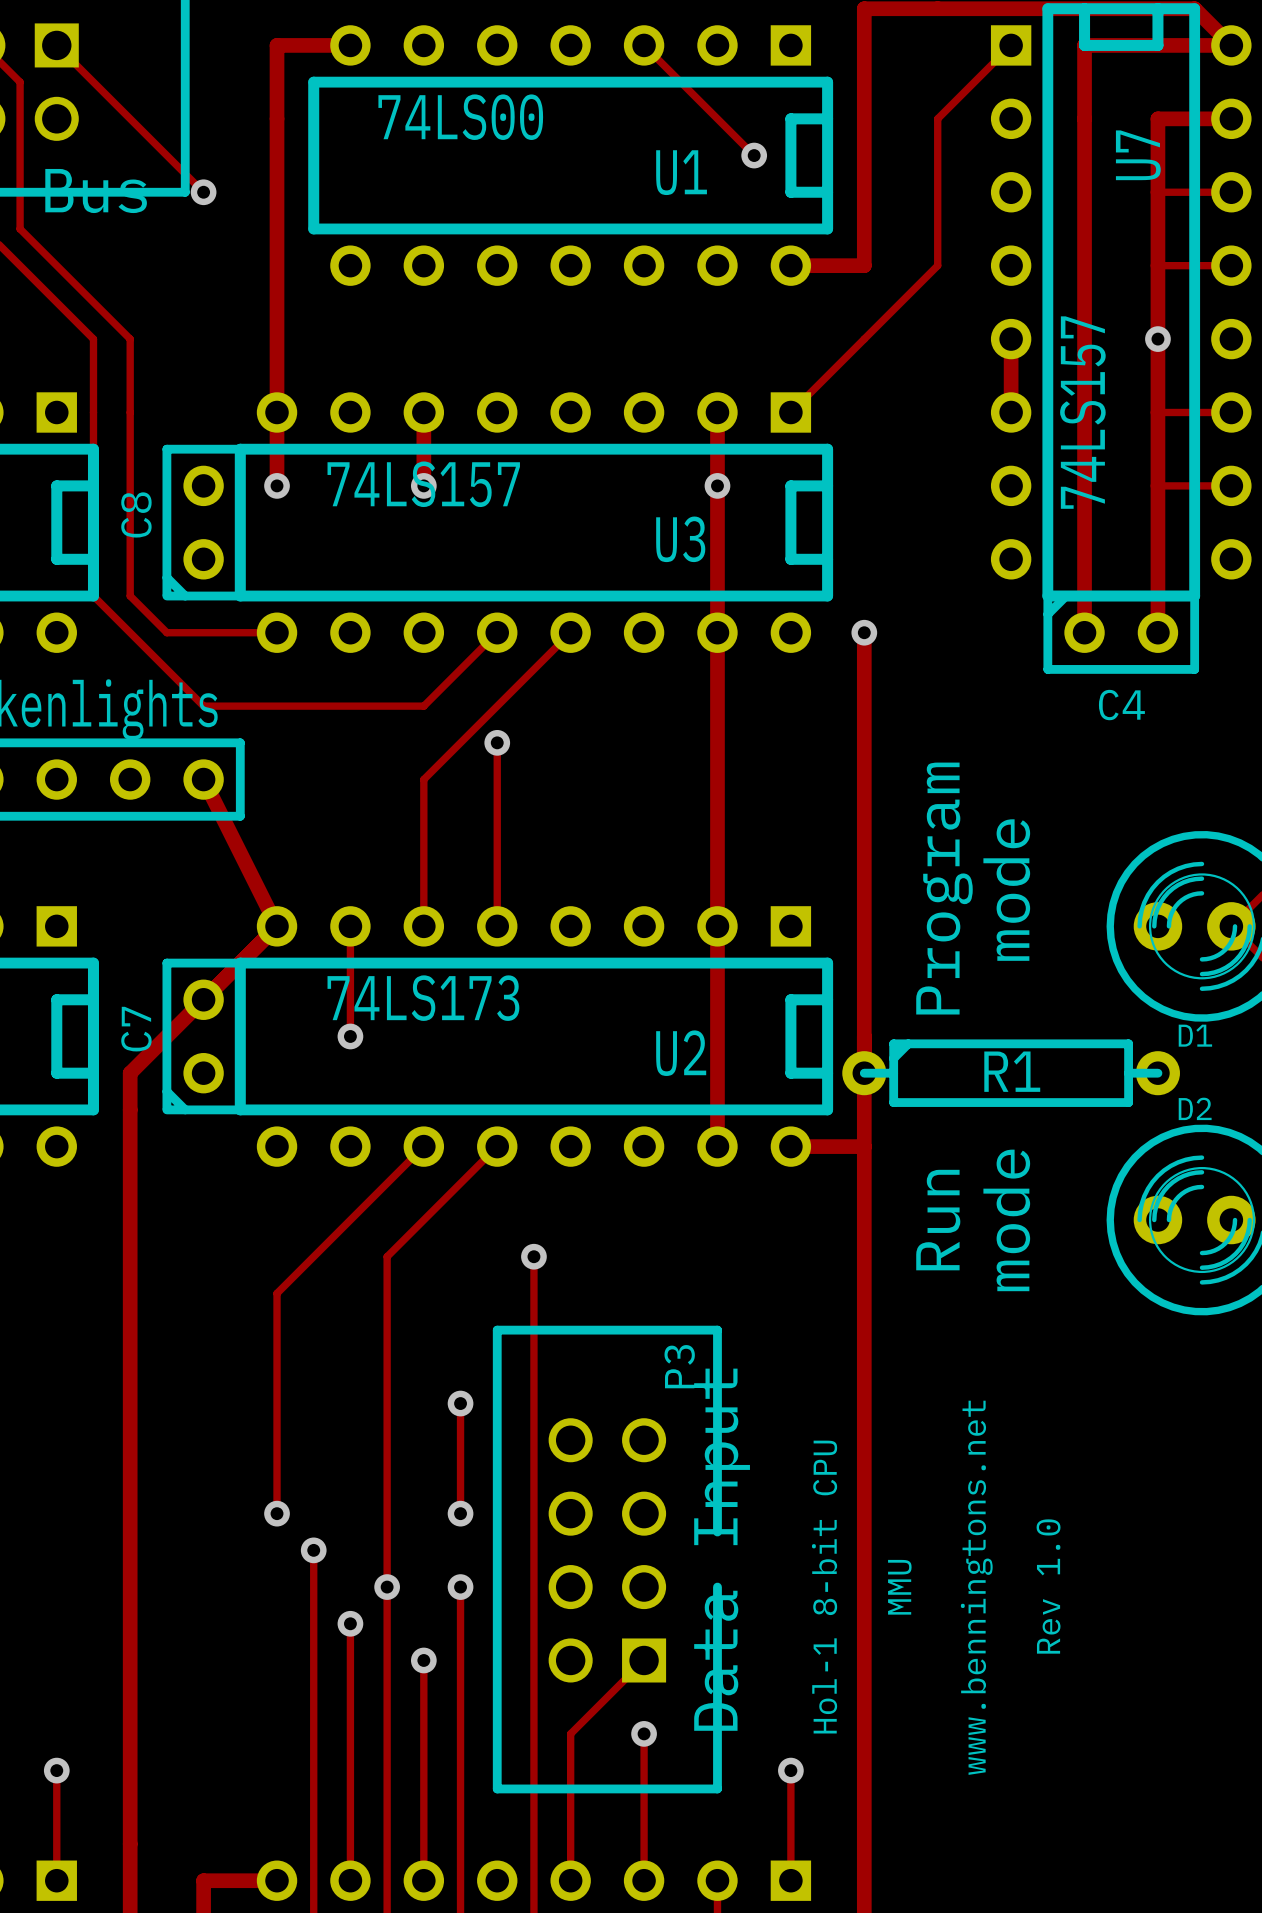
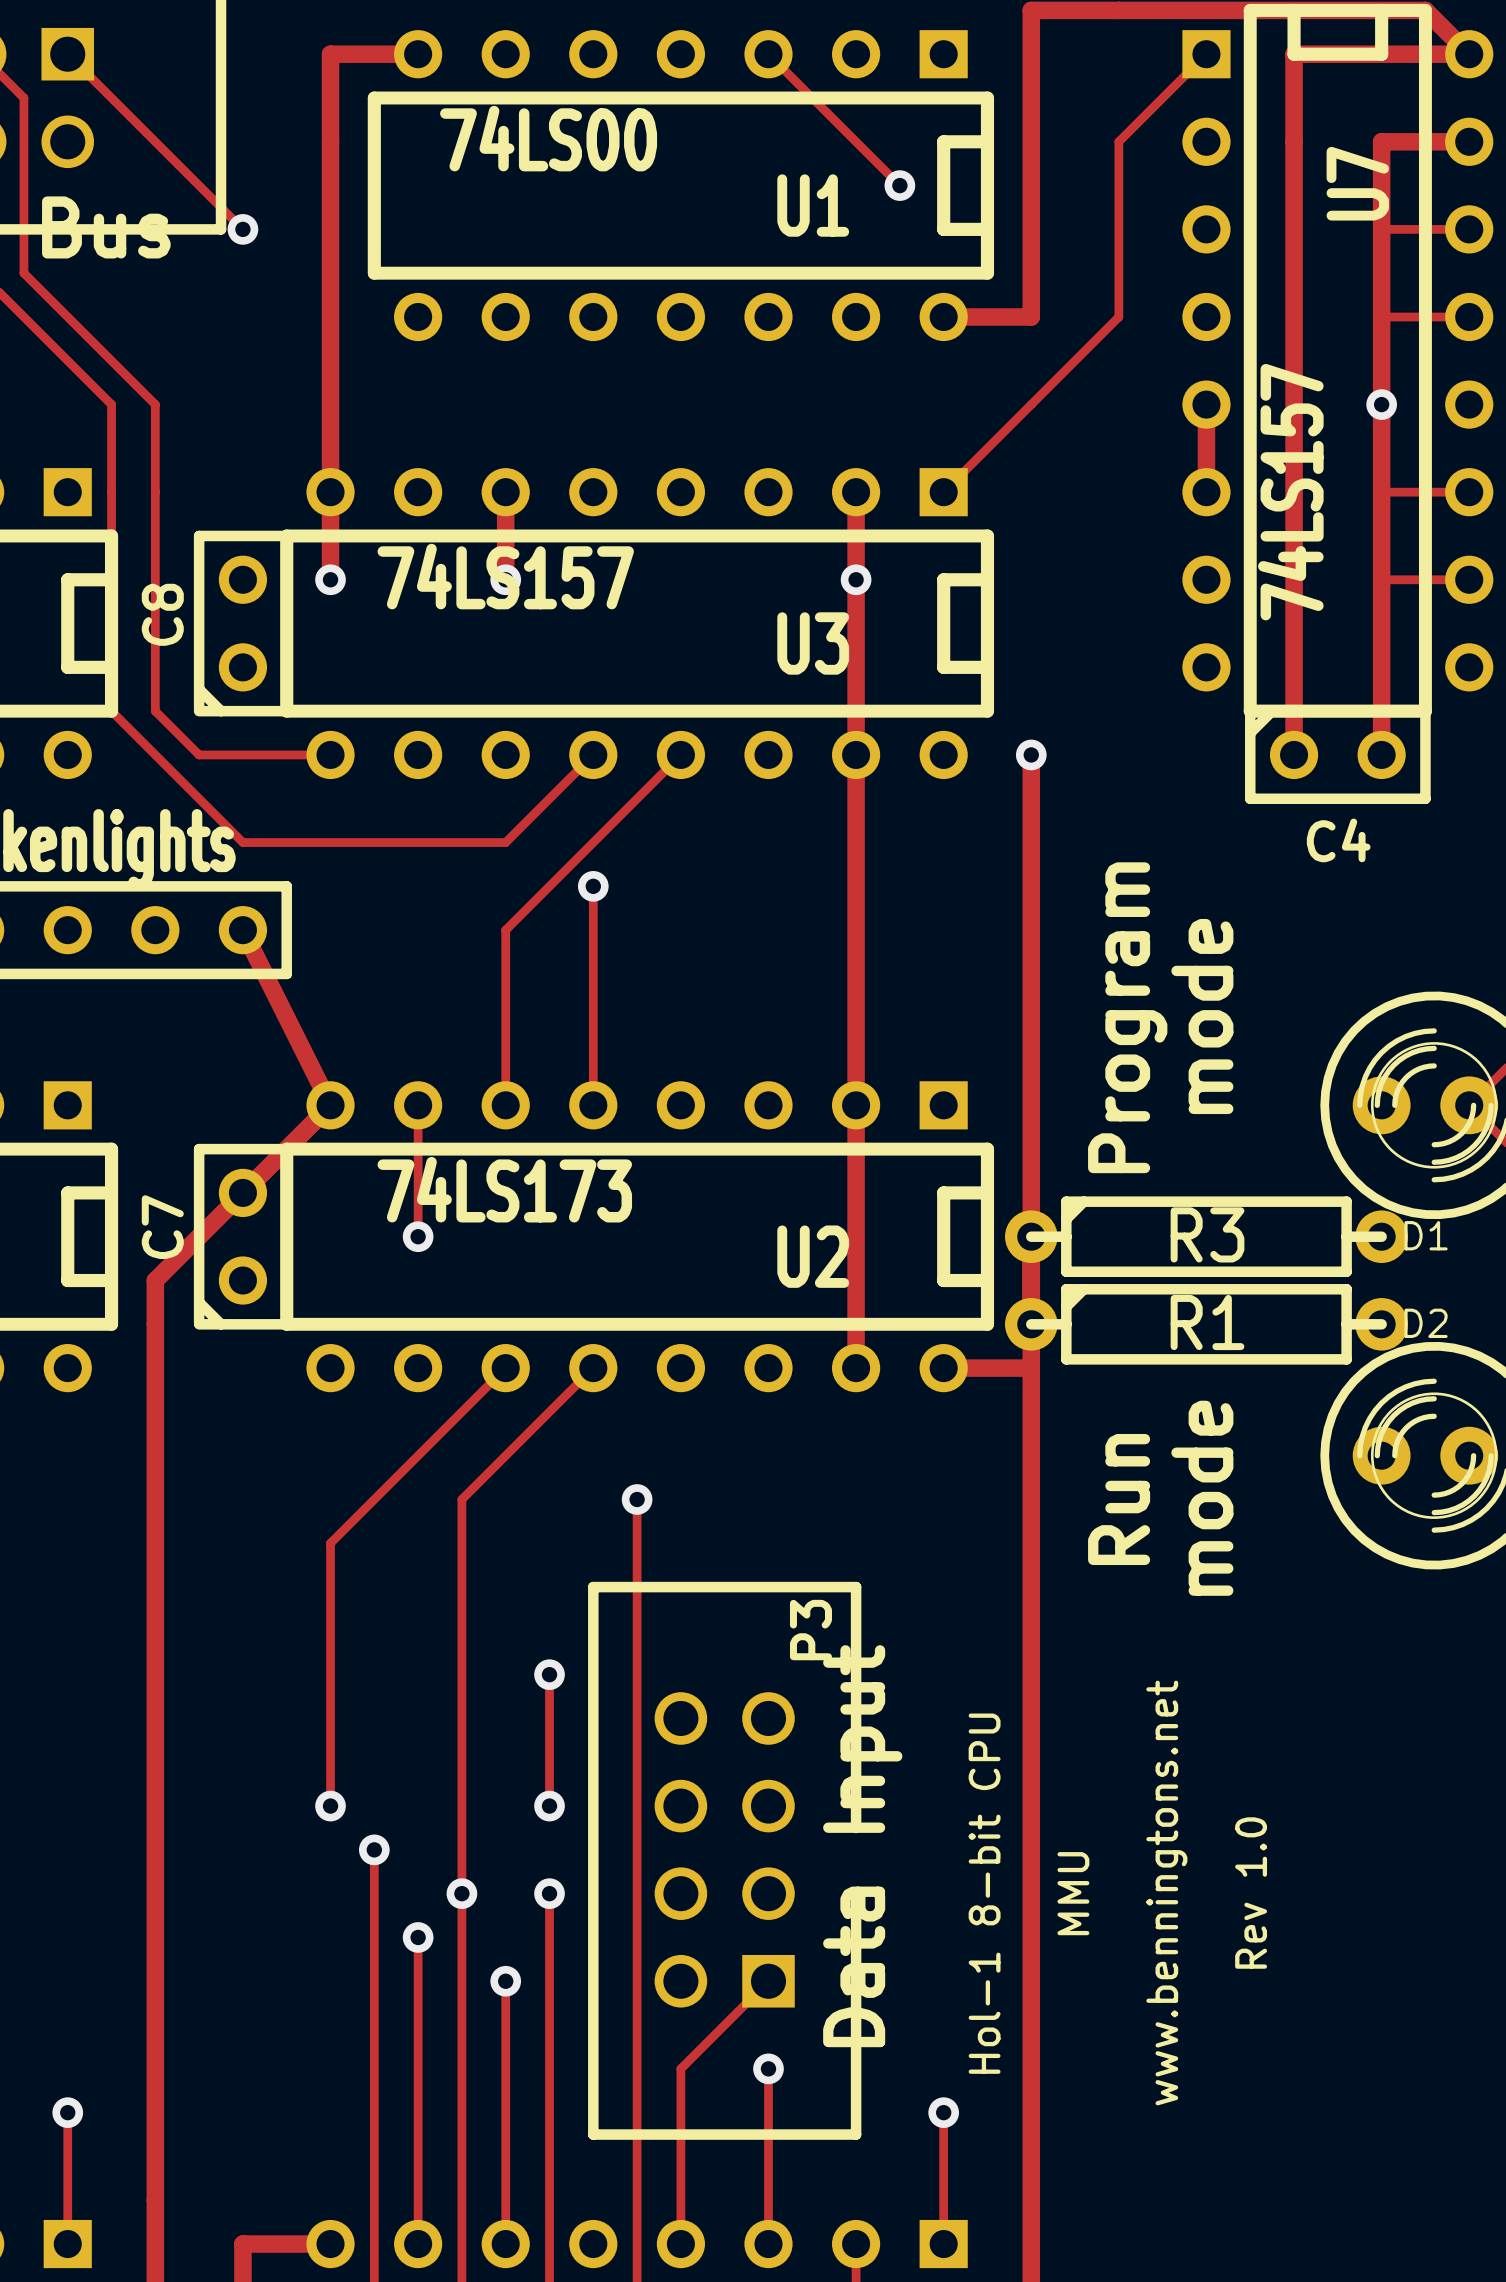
text position: Program (944, 888) -> Program (1127, 1017)
text position: mode (1006, 890) -> mode (1202, 1016)
R3: none -> (1206, 1236)
R1 position: (1011, 1073) -> (1206, 1324)
text position: Run (938, 1220) -> Run (1119, 1499)
text position: mode (1006, 1220) -> mode (1202, 1498)

